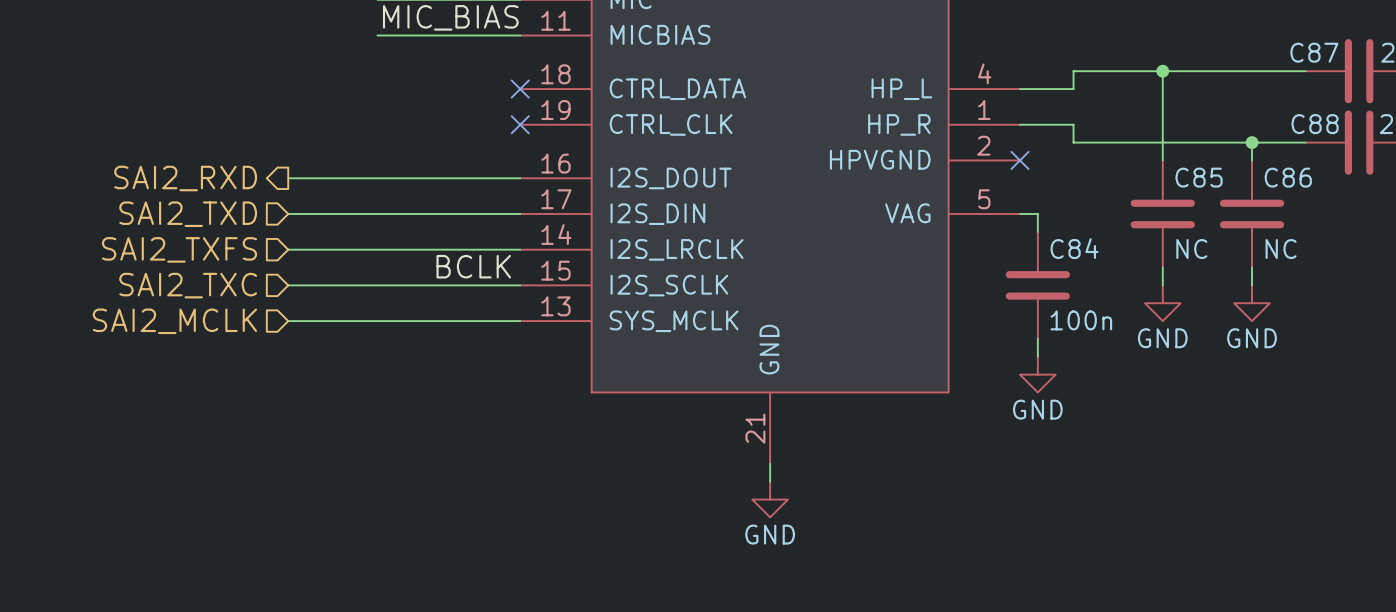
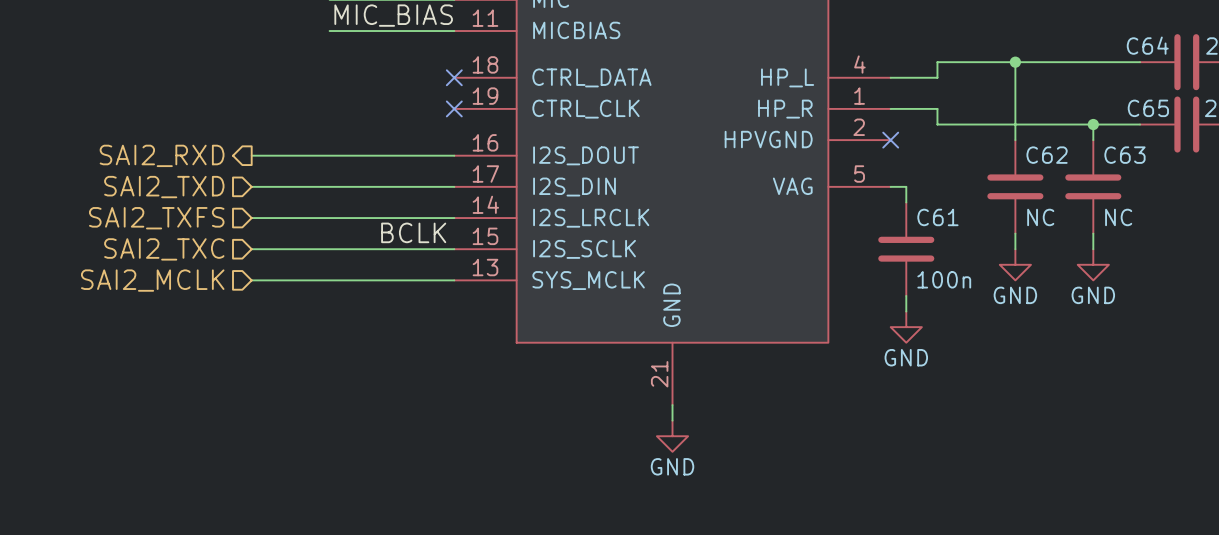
C87 name: C87 (1314, 52) -> C64 (1147, 45)
C88 name: C88 (1315, 124) -> C65 (1148, 108)
C85 name: C85 (1199, 177) -> C62 (1047, 155)
C86 name: C86 (1288, 177) -> C63 (1124, 155)
C84 name: C84 (1074, 248) -> C61 (937, 217)

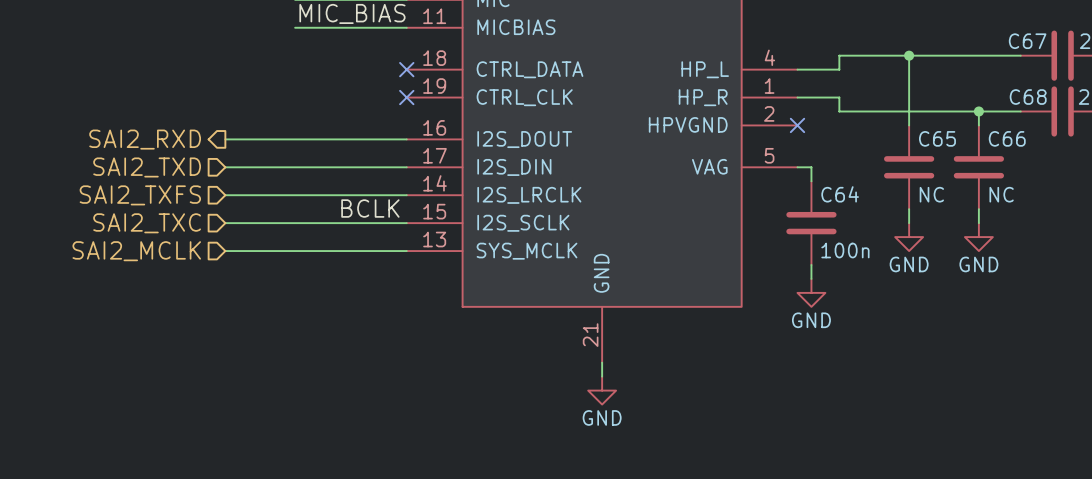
C64 name: C64 (1147, 45) -> C67 (1027, 41)
C65 name: C65 (1148, 108) -> C68 (1028, 97)
C62 name: C62 (1047, 155) -> C65 (937, 138)
C63 name: C63 (1124, 155) -> C66 (1007, 138)
C61 name: C61 (937, 217) -> C64 (840, 194)

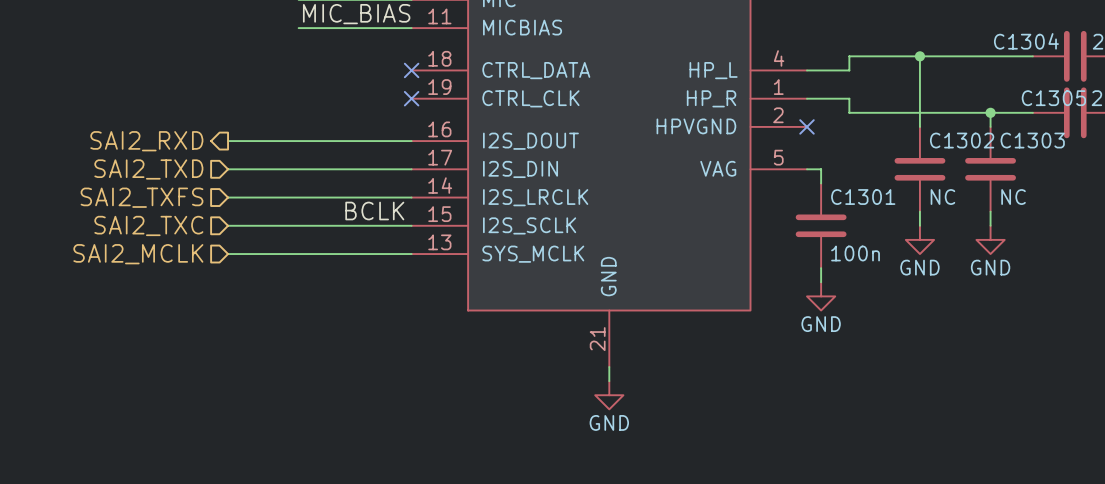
C67 name: C67 (1027, 41) -> C1304 (1026, 41)
C68 name: C68 (1028, 97) -> C1305 (1053, 98)
C65 name: C65 (937, 138) -> C1302 (962, 140)
C66 name: C66 (1007, 138) -> C1303 (1032, 140)
C64 name: C64 (840, 194) -> C1301 (863, 197)

